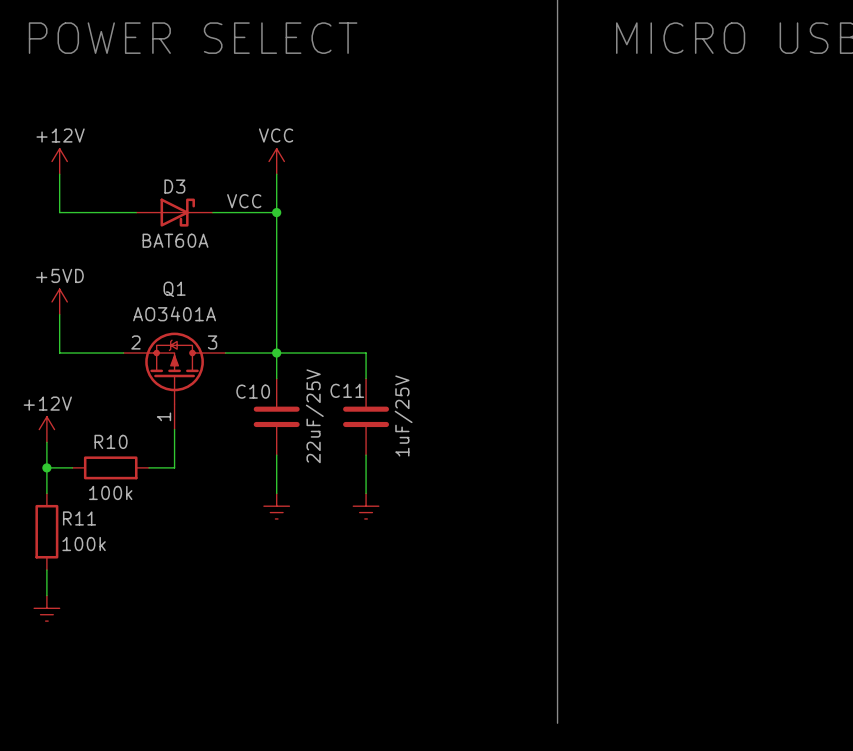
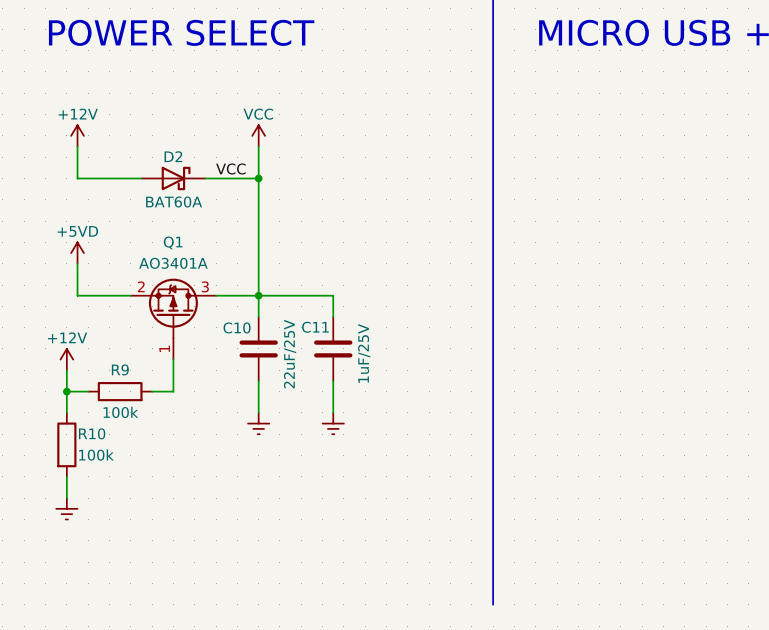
D3 name: D3 (174, 186) -> D2 (173, 156)
R10 name: R10 (111, 441) -> R9 (120, 369)
R11 name: R11 (79, 518) -> R10 (92, 433)

